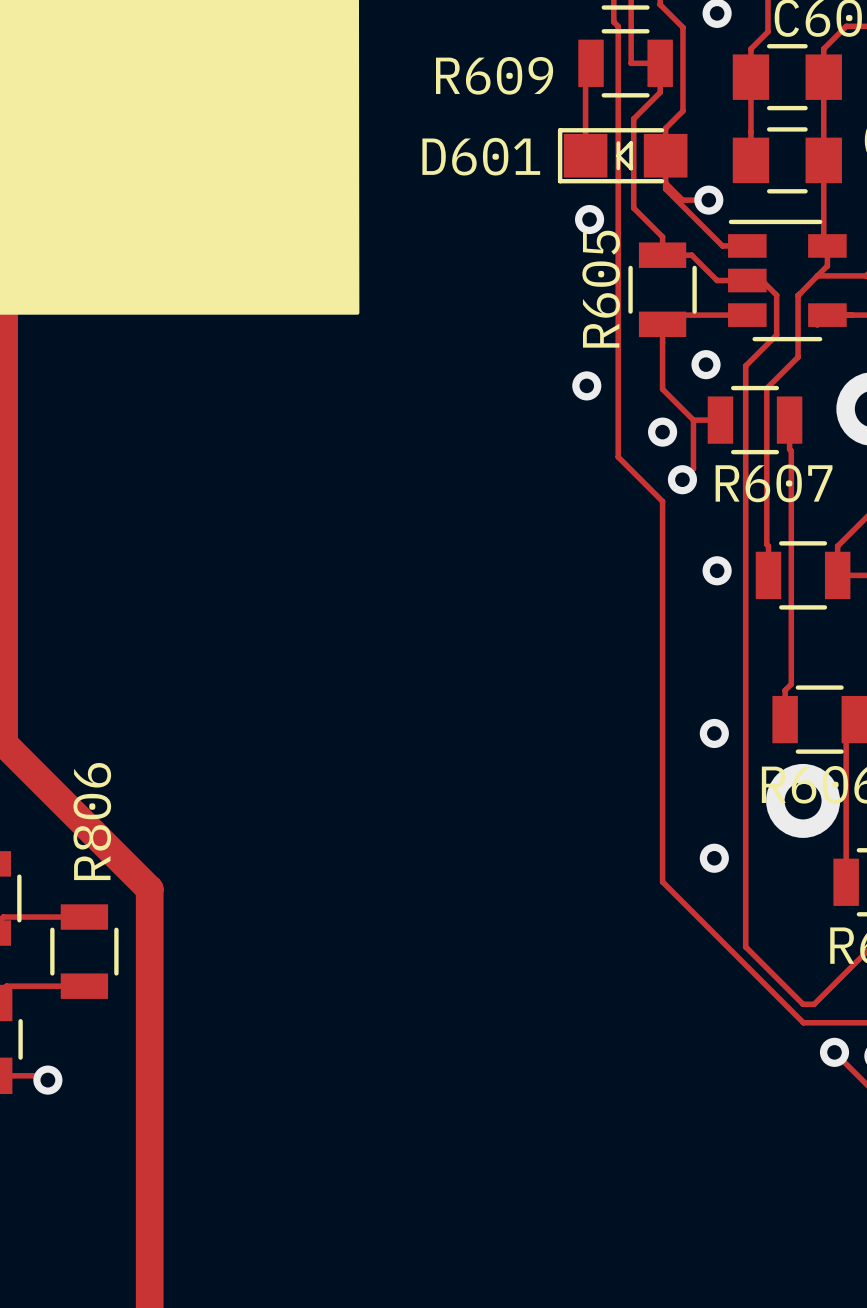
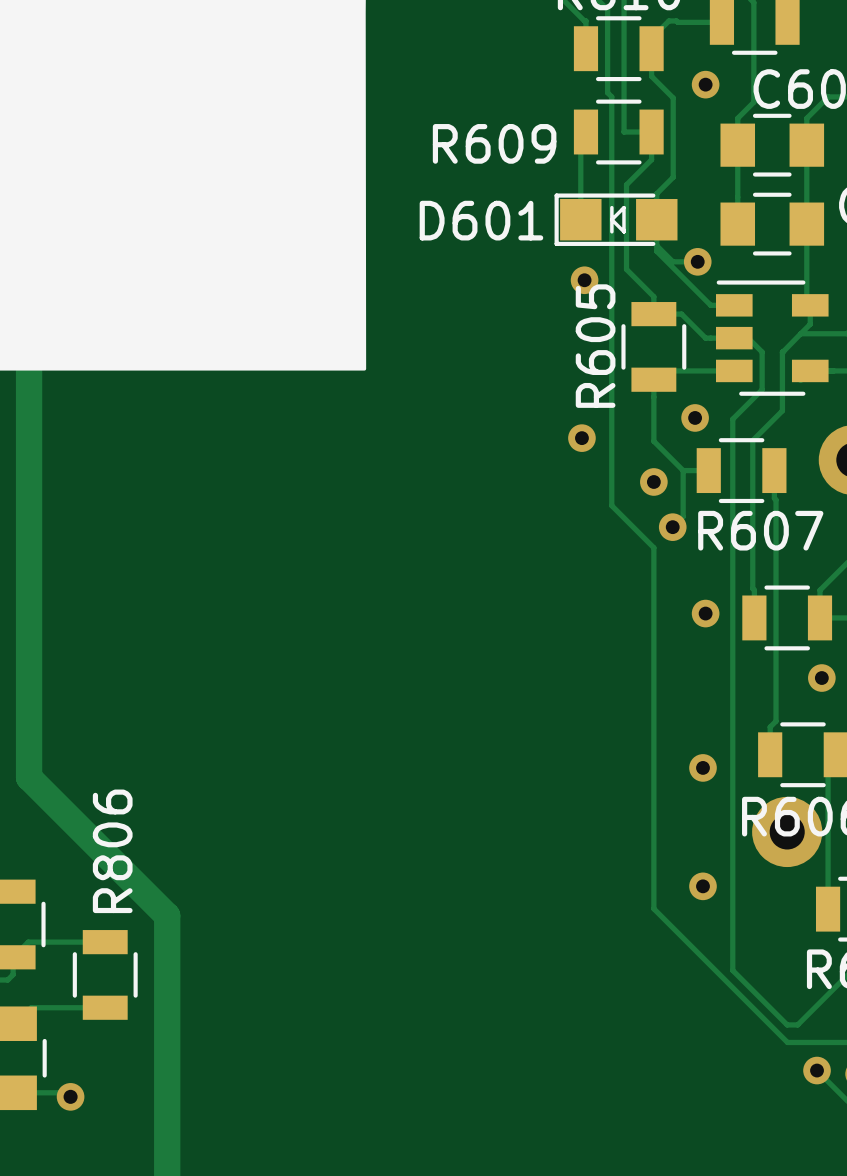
via: none -> (821, 678)

